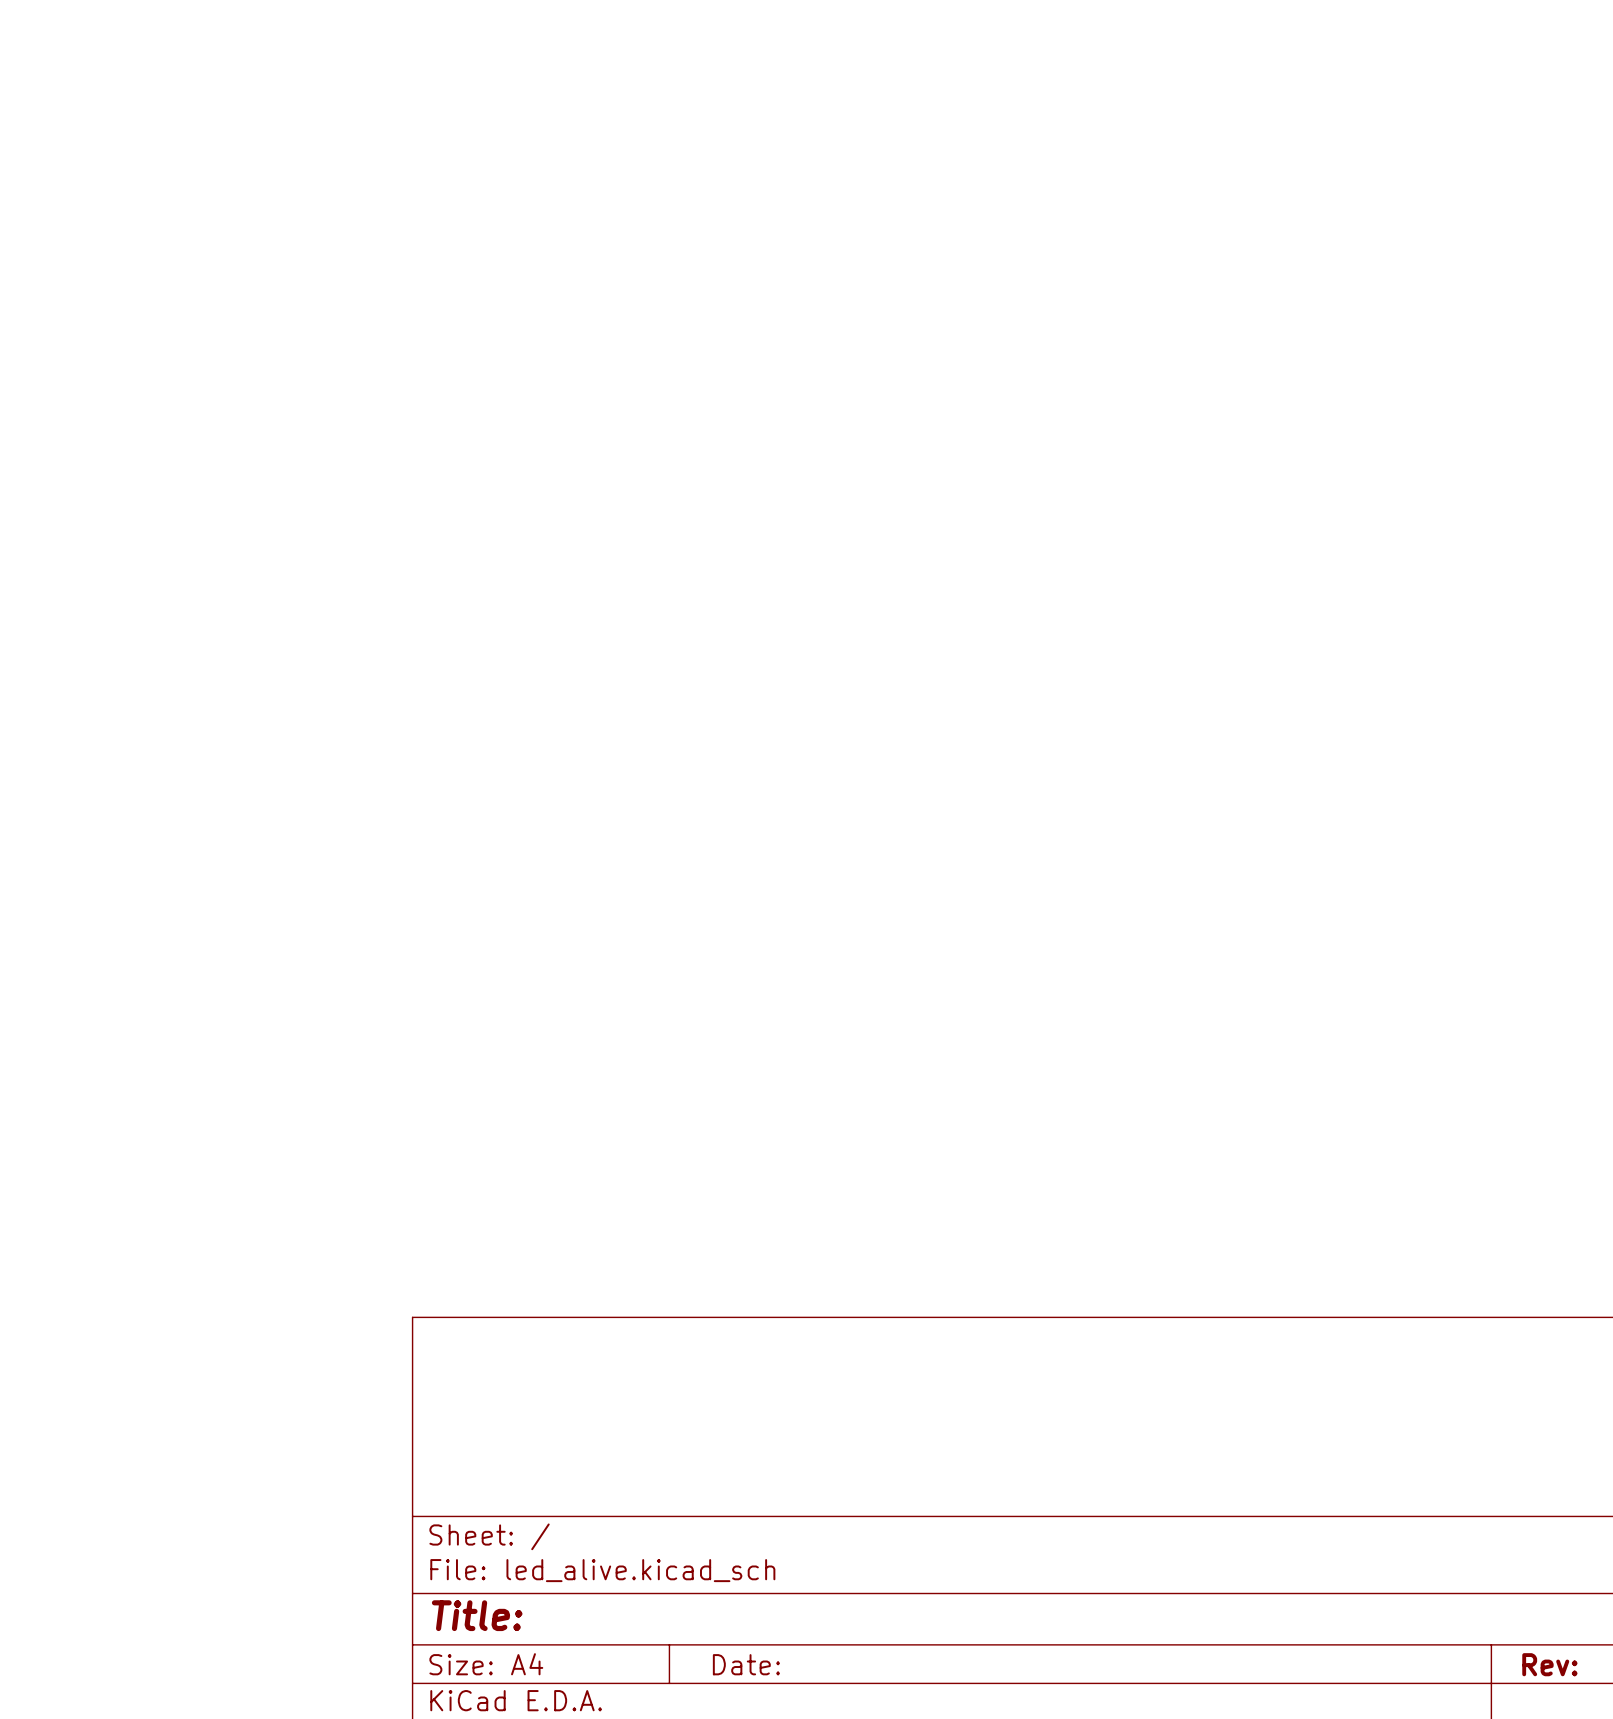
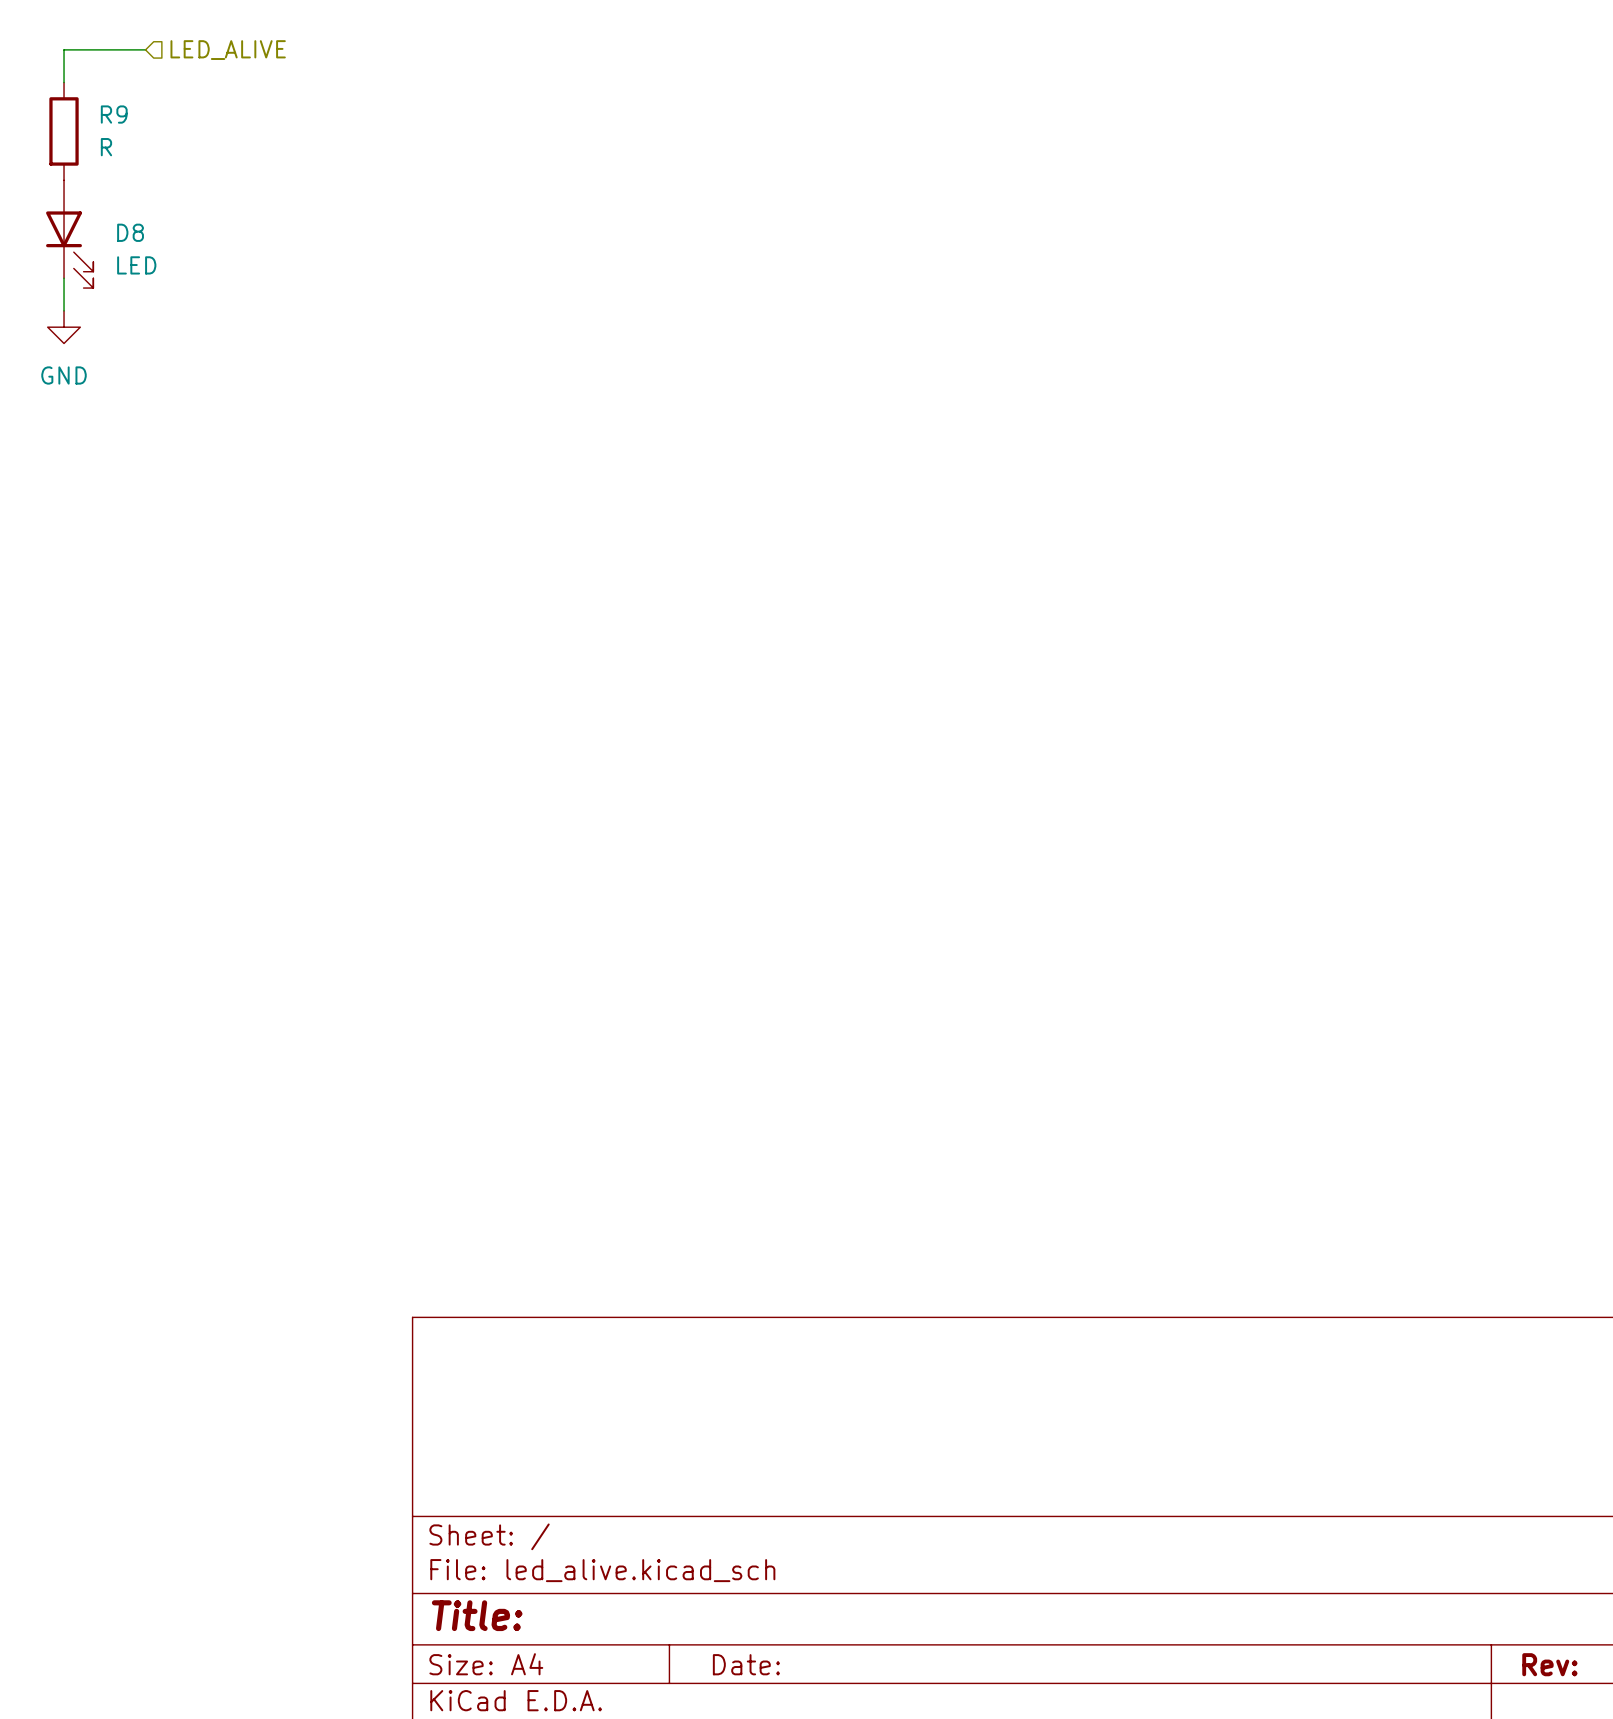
wire: none -> (145, 49) (64, 49) (64, 82)
hierarchical label: none -> LED_ALIVE (228, 50)
R9: none -> R (64, 131)
D8: none -> LED (69, 234)
wire: none -> (64, 278) (64, 310)
power symbol: none -> GND (64, 327)

